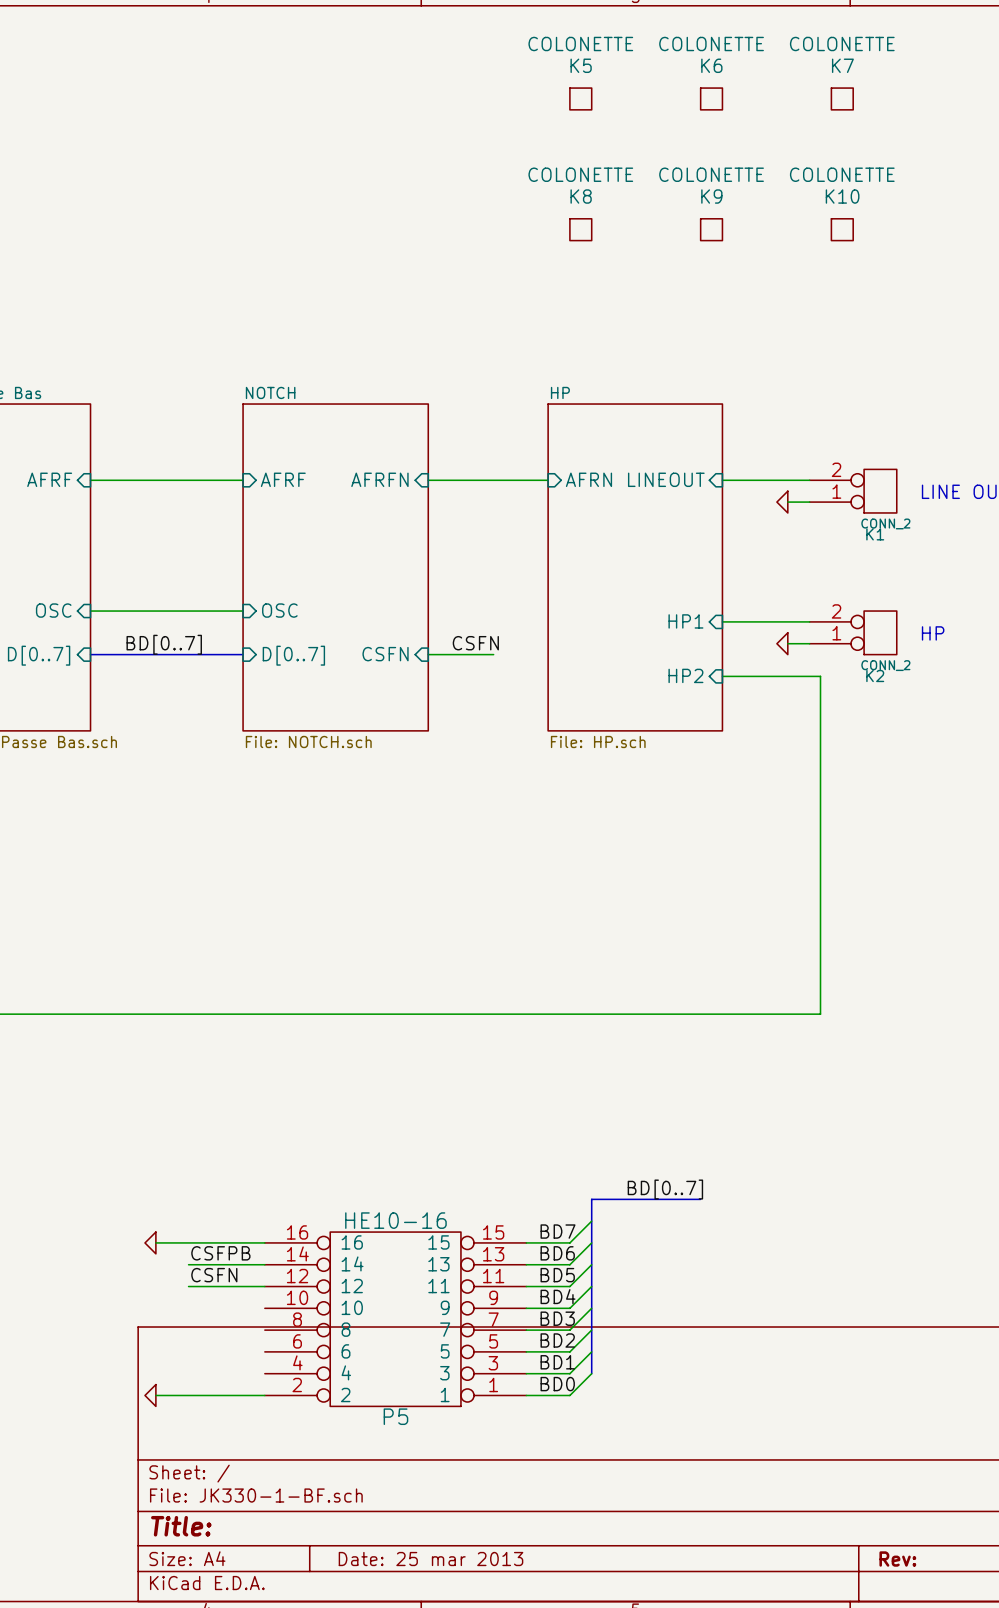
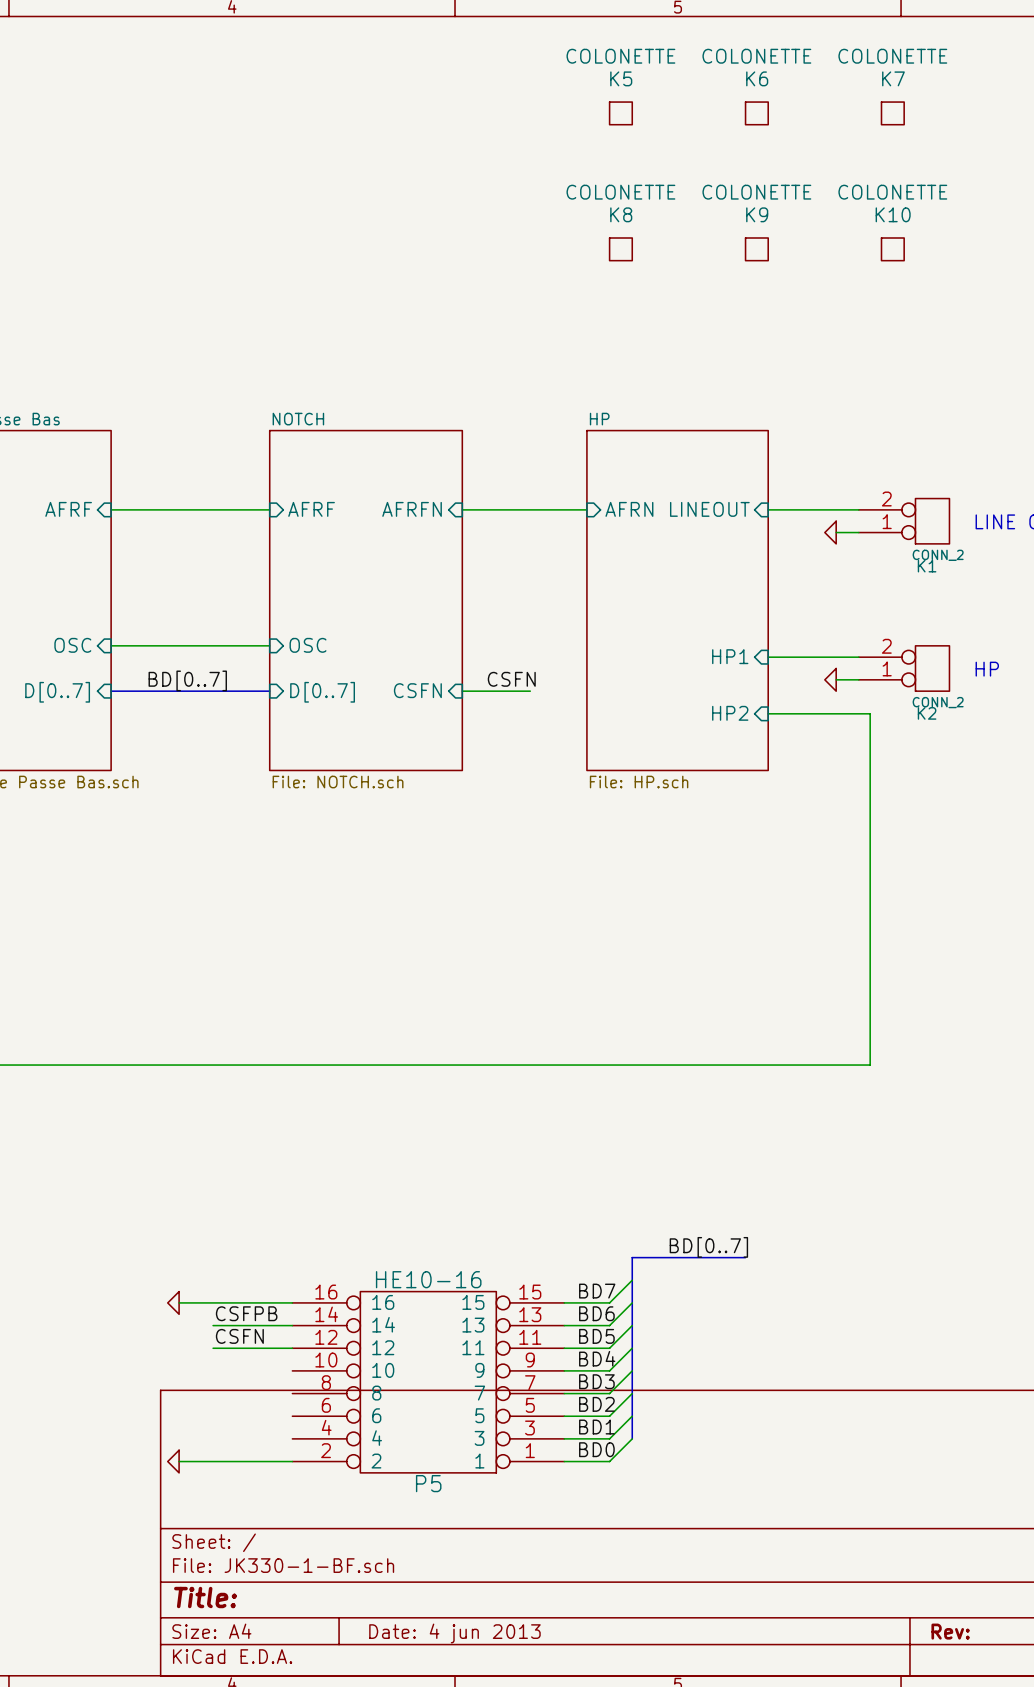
title block: Date: 25 mar 2013 (431, 1559) -> Date: 4 jun 2013 (454, 1633)

